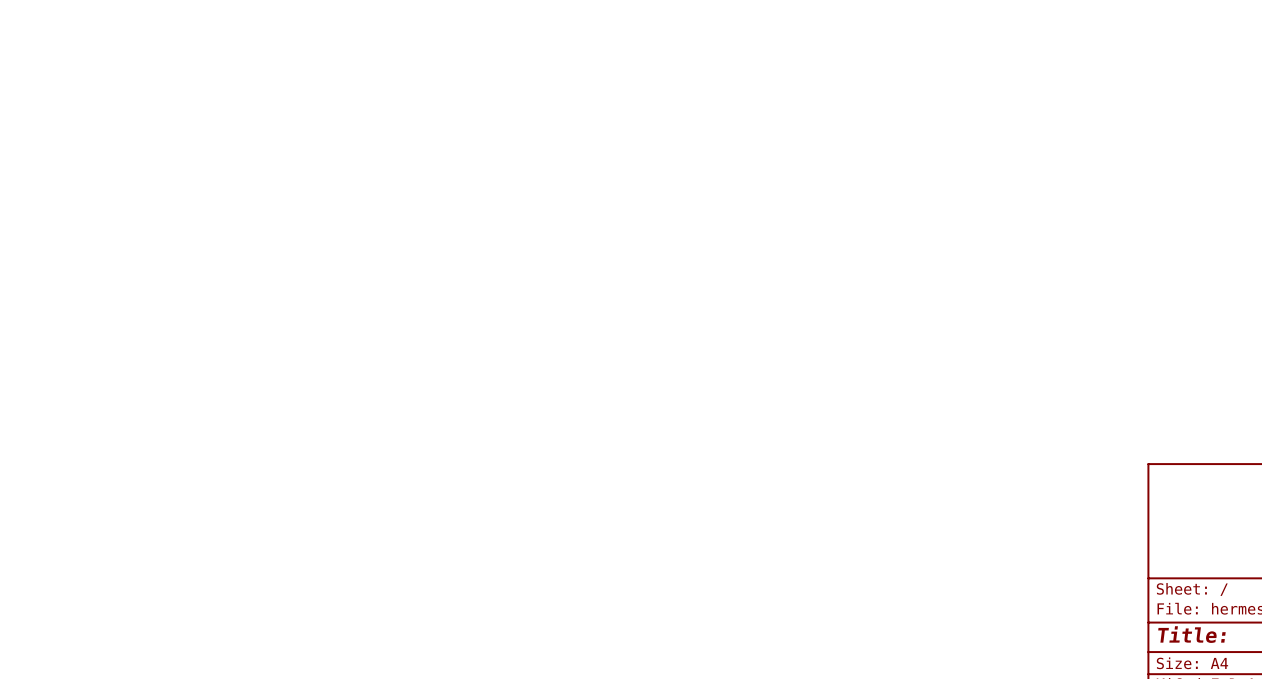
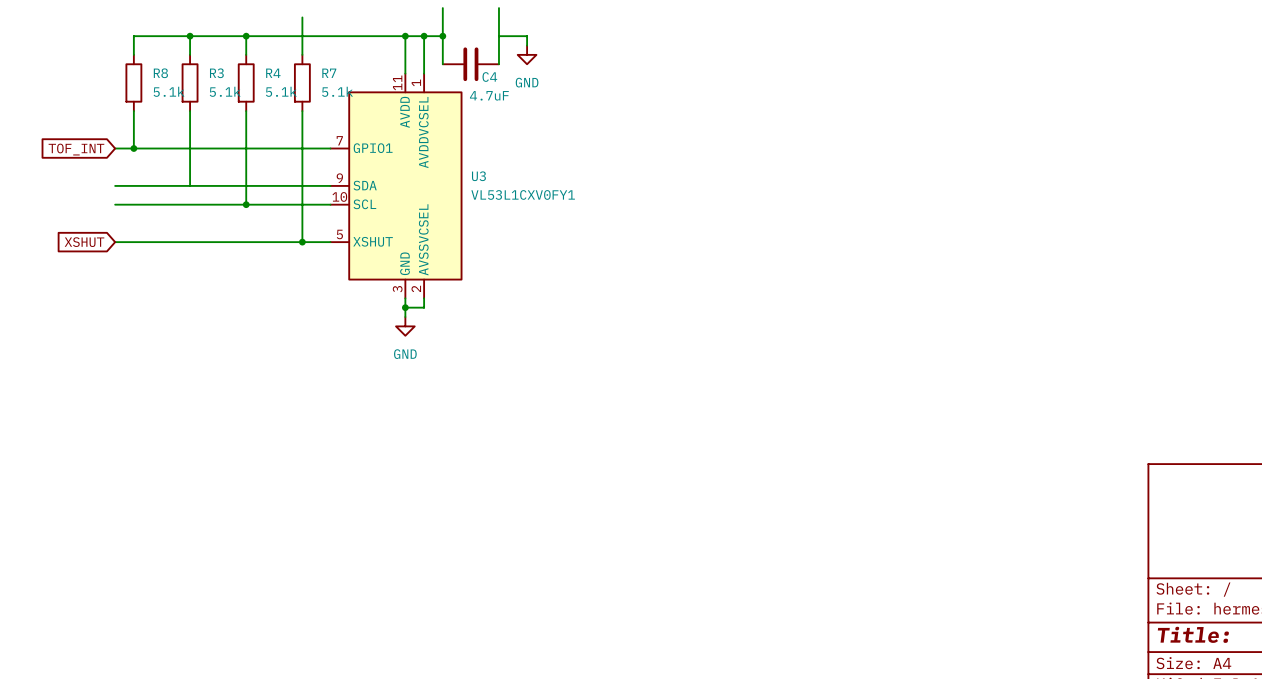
wire: none -> (442, 8) (442, 64)
wire: none -> (498, 8) (498, 64)
wire: none -> (302, 17) (302, 54)
wire: none -> (190, 36) (190, 54)
junction: none -> (190, 36)
wire: none -> (246, 36) (246, 54)
junction: none -> (246, 36)
wire: none -> (405, 36) (405, 73)
junction: none -> (405, 36)
wire: none -> (424, 36) (424, 73)
junction: none -> (424, 36)
wire: none -> (442, 36) (133, 36) (133, 54)
junction: none -> (442, 36)
wire: none -> (498, 36) (527, 36) (527, 45)
power symbol: none -> GND (527, 54)
C4: none -> 4.7uF (470, 64)
R8: none -> 5.1k (133, 82)
R3: none -> 5.1k (190, 82)
R4: none -> 5.1k (246, 82)
R7: none -> 5.1k (302, 82)
wire: none -> (133, 111) (133, 148)
wire: none -> (190, 111) (190, 185)
wire: none -> (246, 111) (246, 204)
wire: none -> (302, 111) (302, 242)
wire: none -> (115, 148) (330, 148)
junction: none -> (133, 148)
global label: none -> TOF_INT (76, 149)
wire: none -> (115, 185) (330, 185)
U3: none -> VL53L1CXV0FY1 (396, 185)
wire: none -> (115, 204) (330, 204)
junction: none -> (246, 204)
global label: none -> XSHUT (84, 242)
wire: none -> (115, 242) (330, 242)
junction: none -> (302, 242)
wire: none -> (405, 298) (405, 317)
wire: none -> (424, 298) (424, 307) (405, 307)
junction: none -> (405, 307)
power symbol: none -> GND (405, 326)

